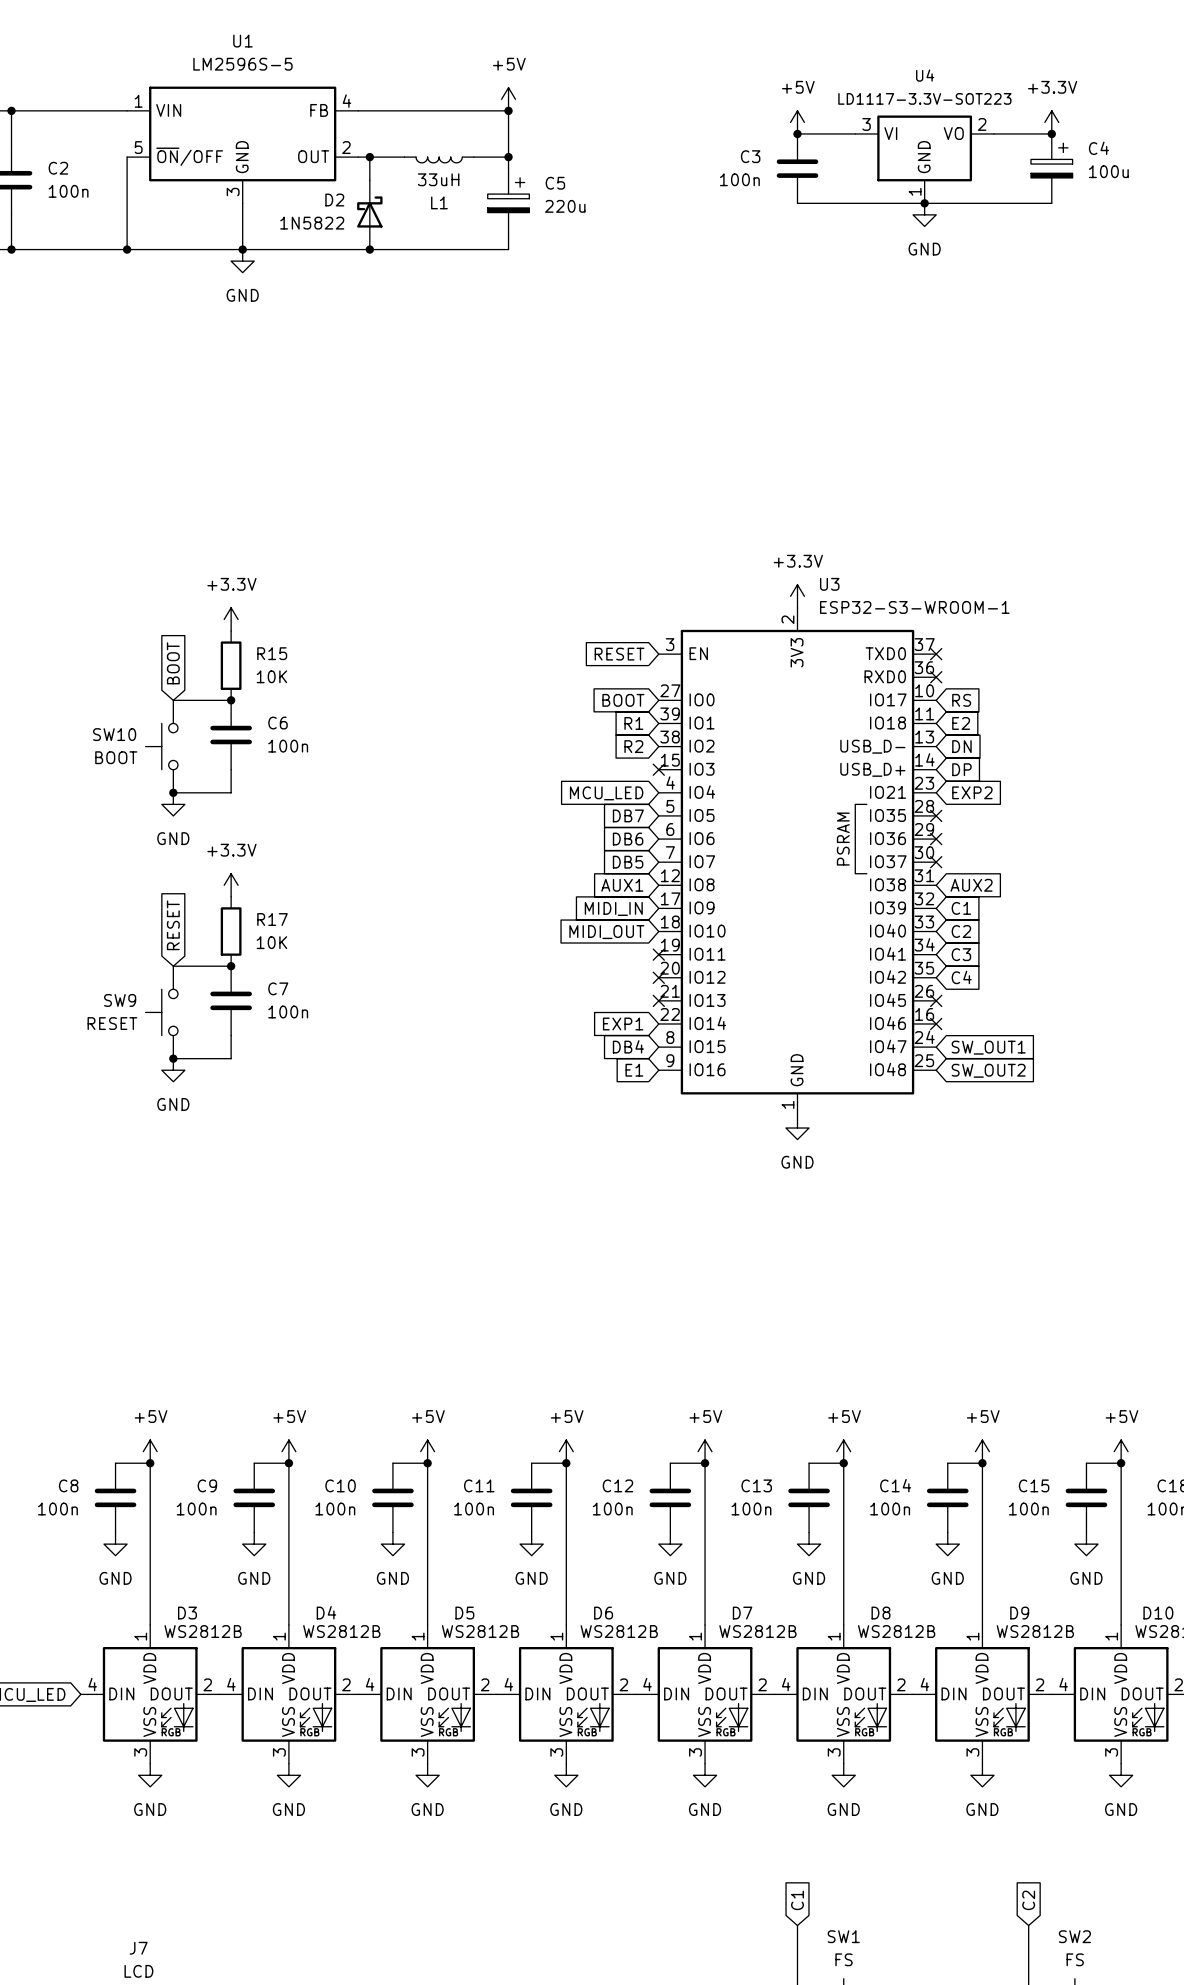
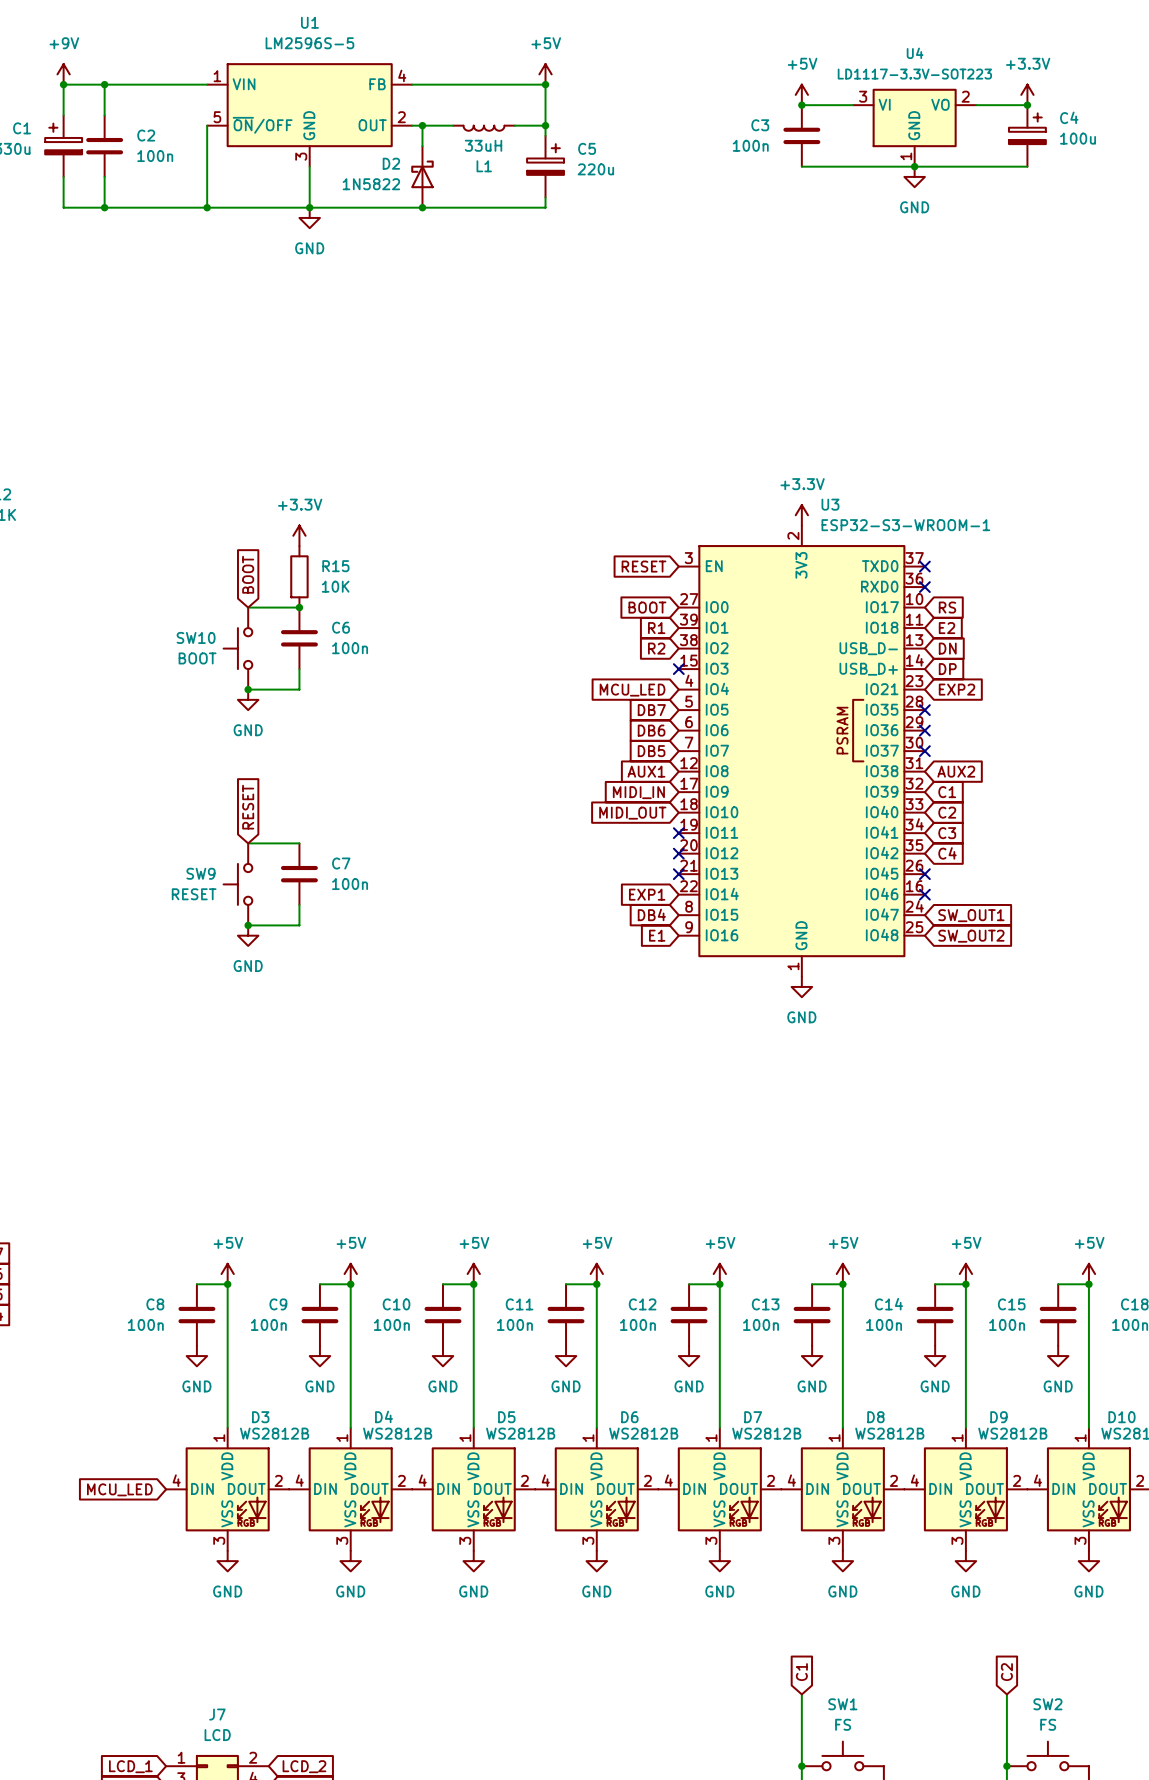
power symbol: +3.3V (231, 885) -> none
R17: 10K (231, 931) -> none
junction: (231, 966) -> none

